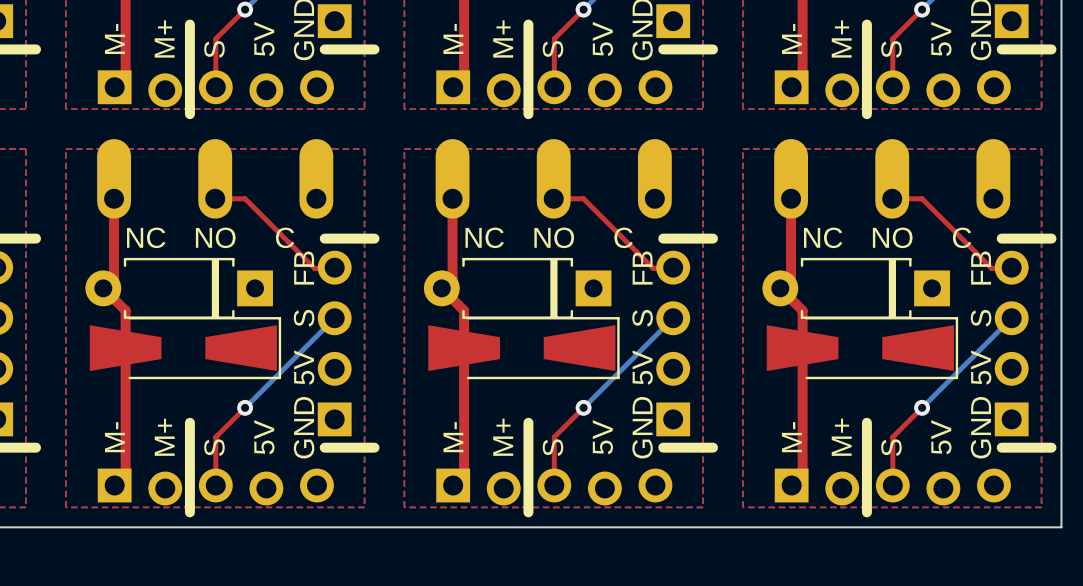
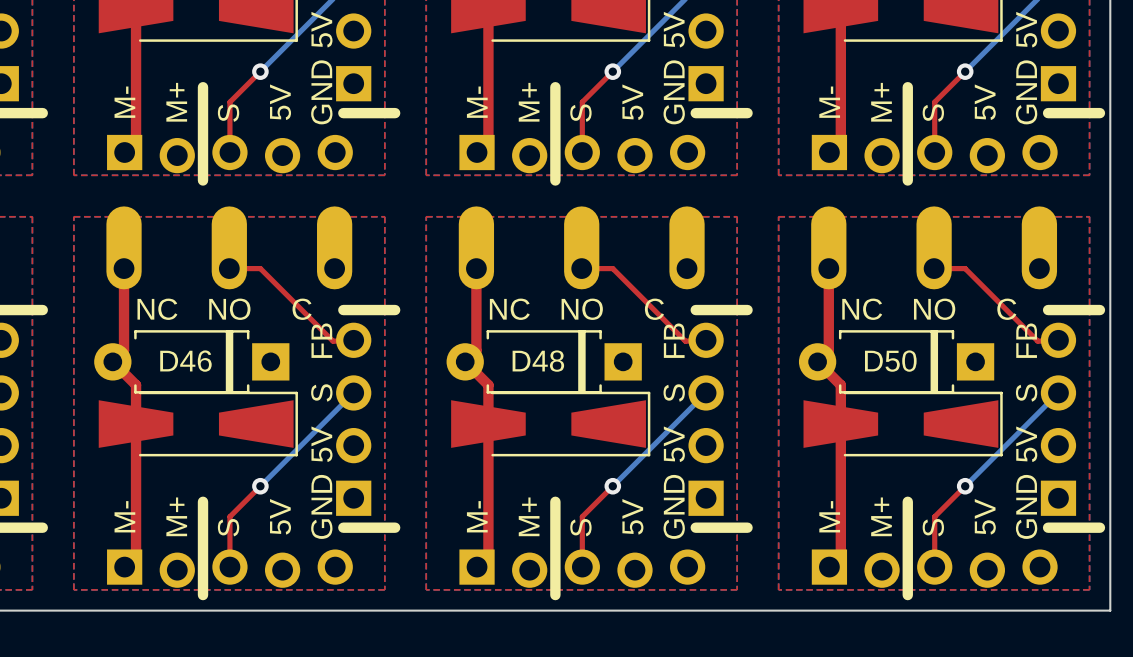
D46 name: none -> D46 (185, 361)
D48 name: none -> D48 (538, 361)
D50 name: none -> D50 (890, 361)

